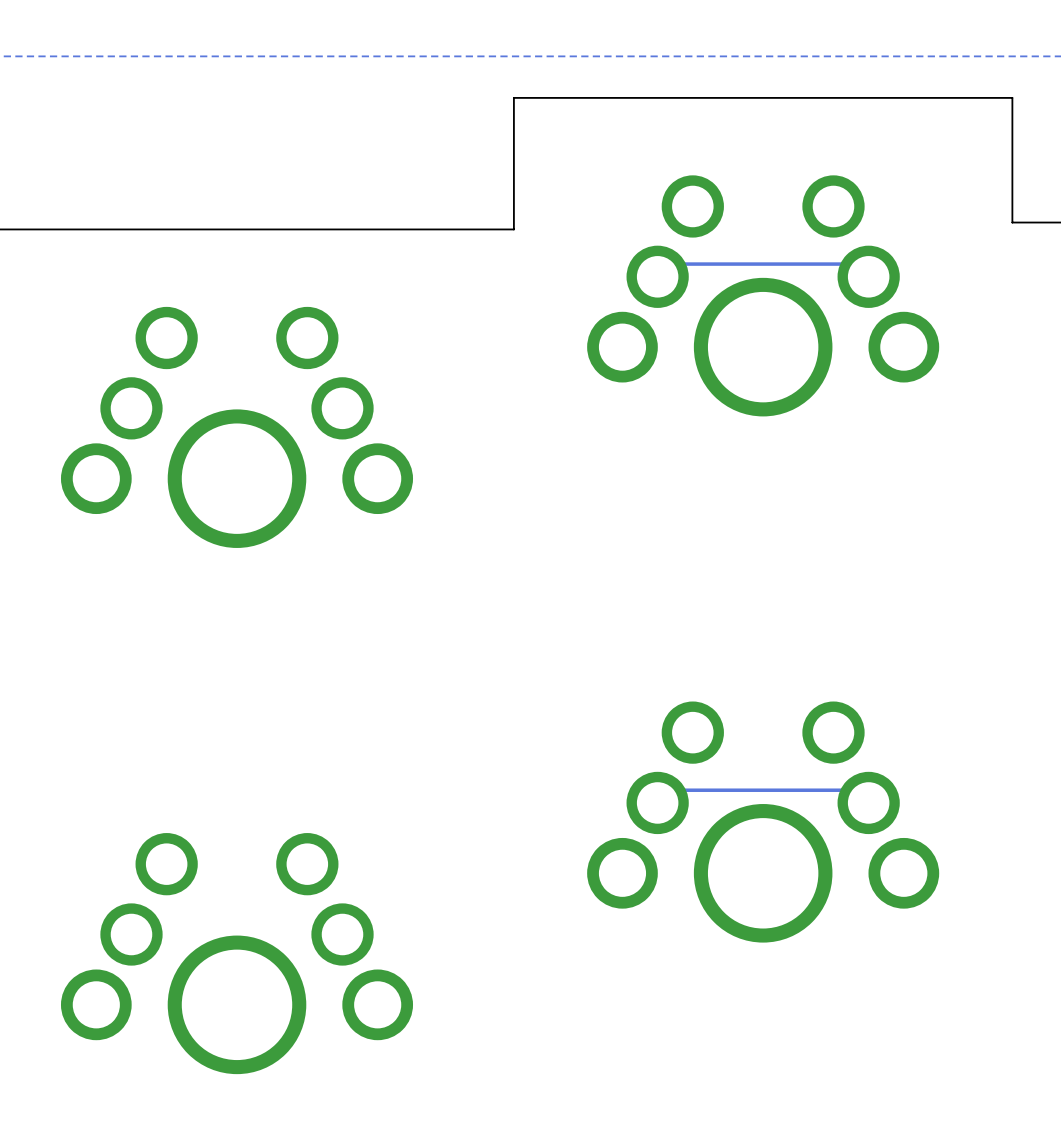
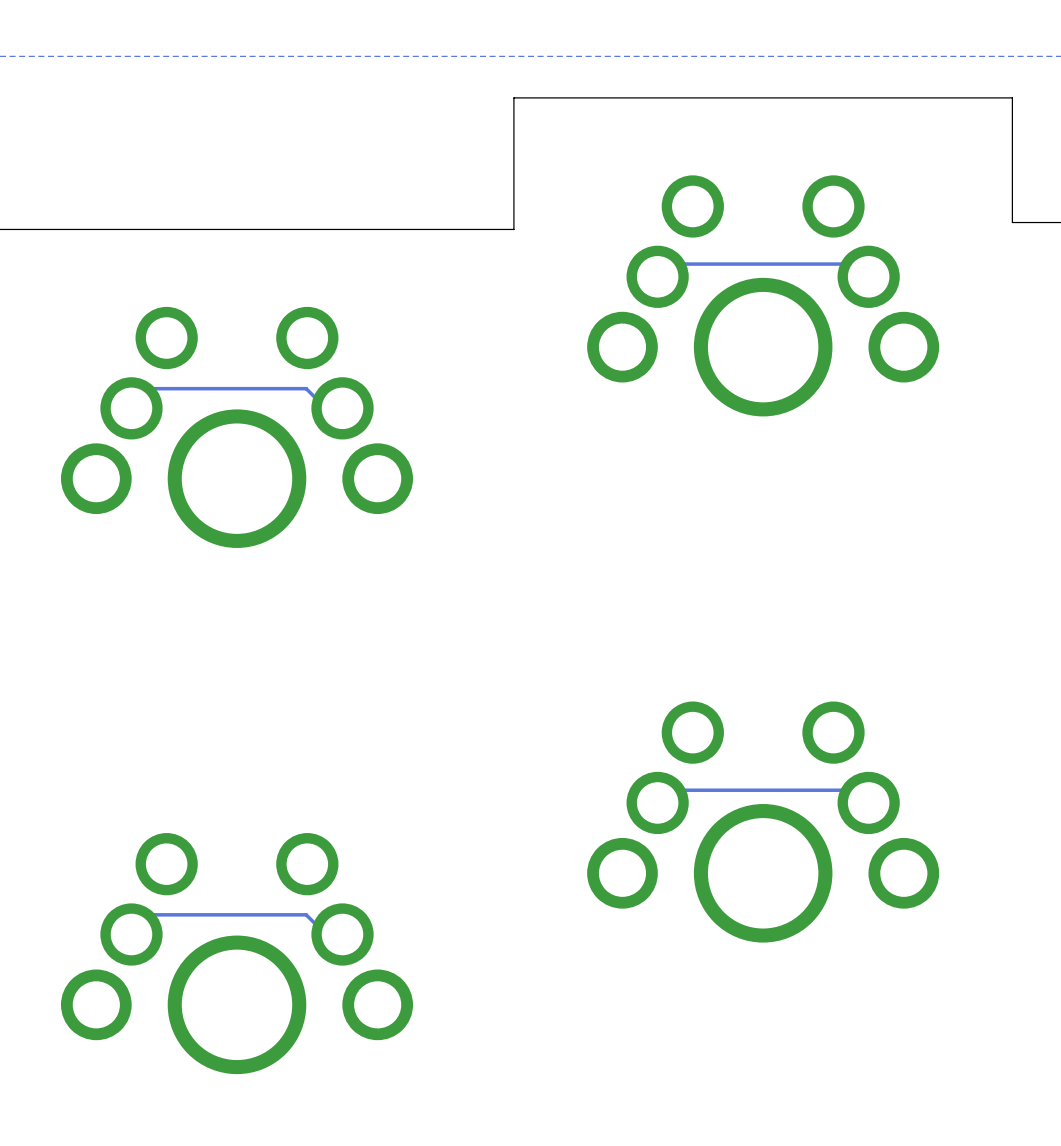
track: none -> (342, 408) (333, 402) (320, 402) (306, 388) (153, 388) (131, 408)
track: none -> (342, 934) (333, 928) (320, 928) (306, 914) (153, 914) (131, 934)

